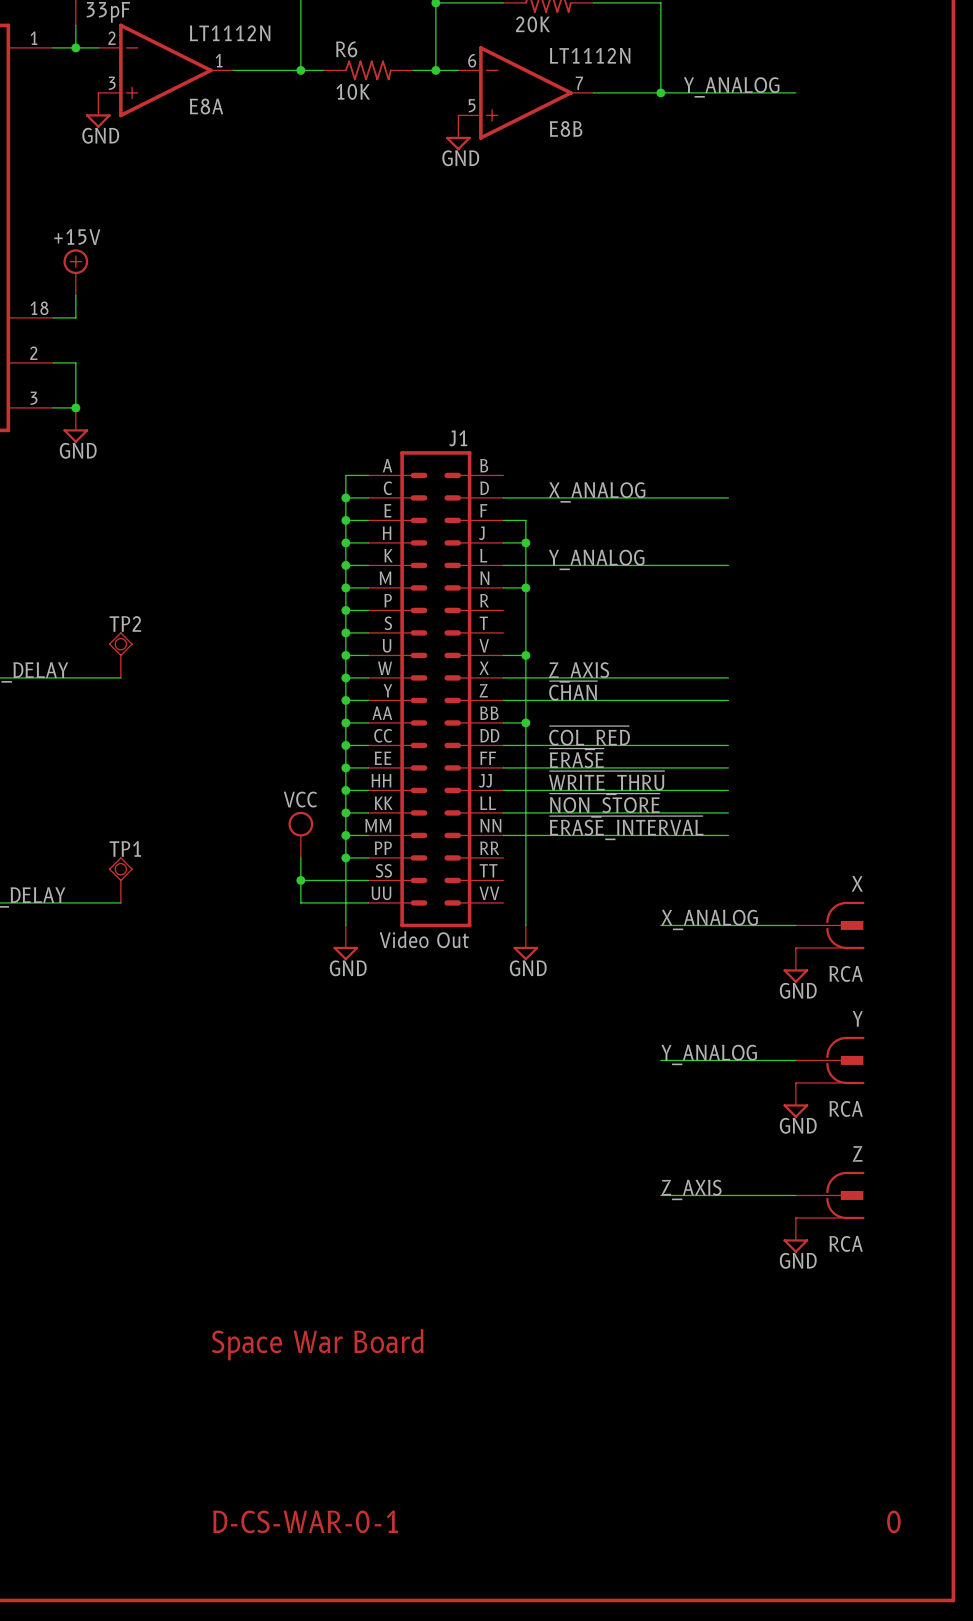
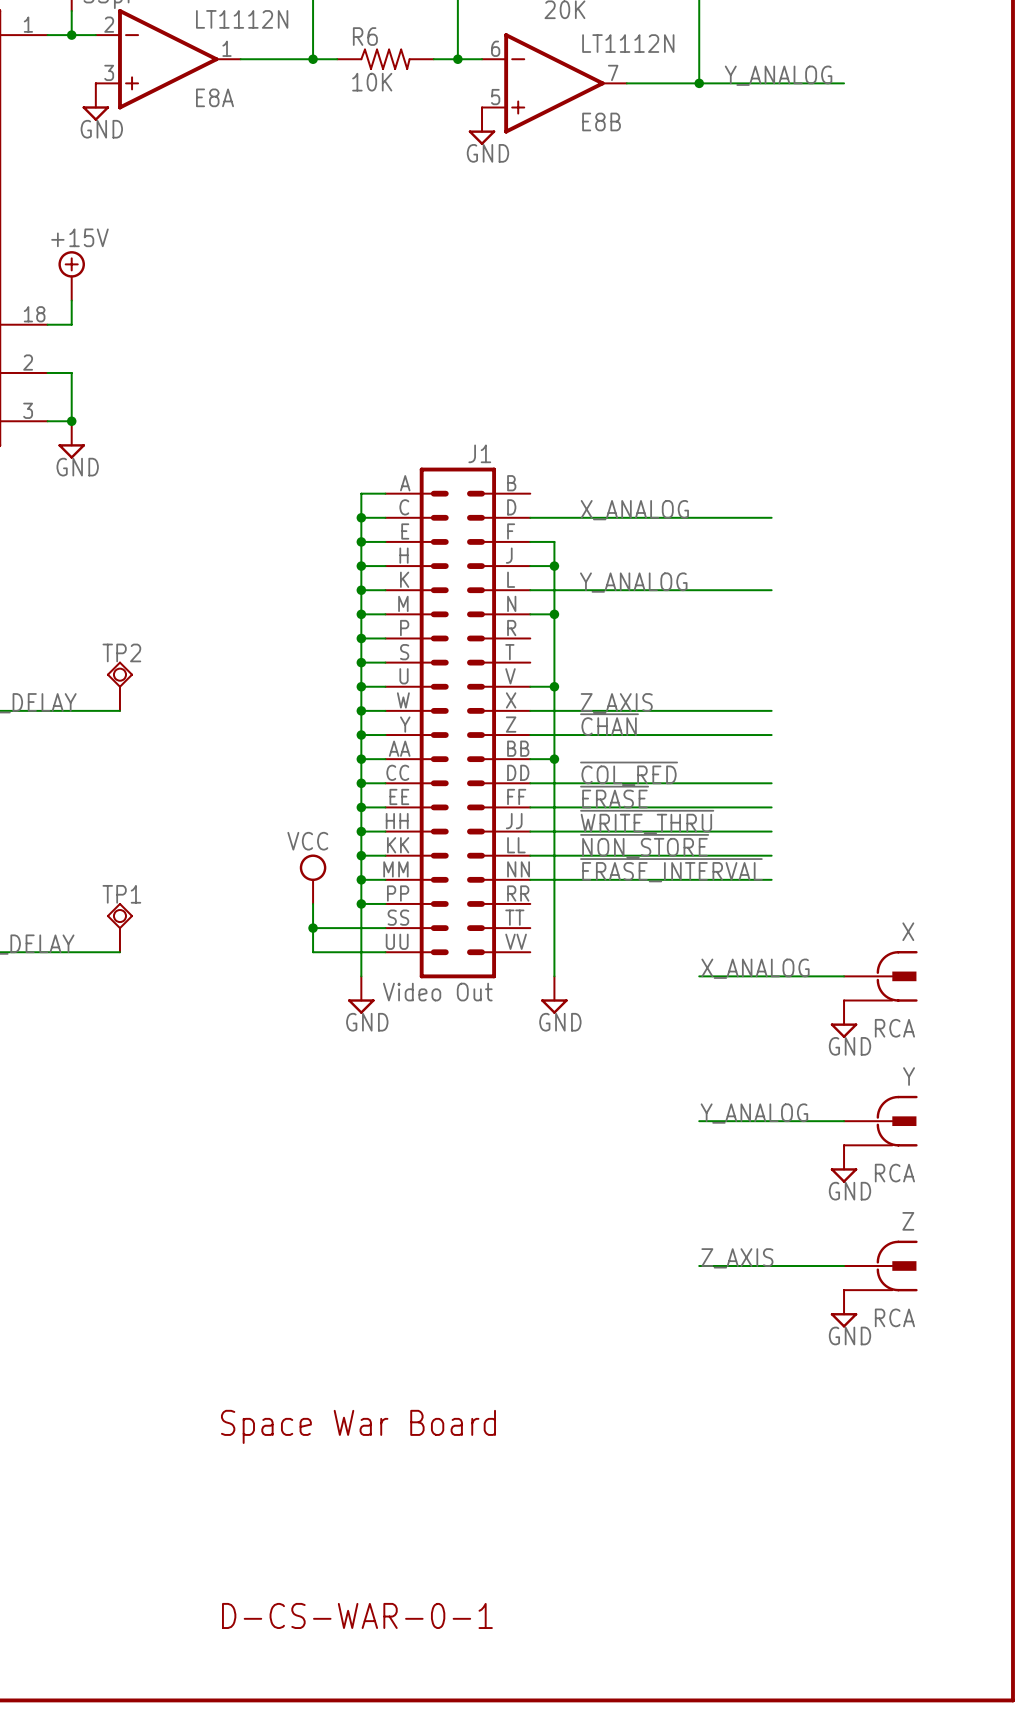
text: 0 (893, 1521) -> none

